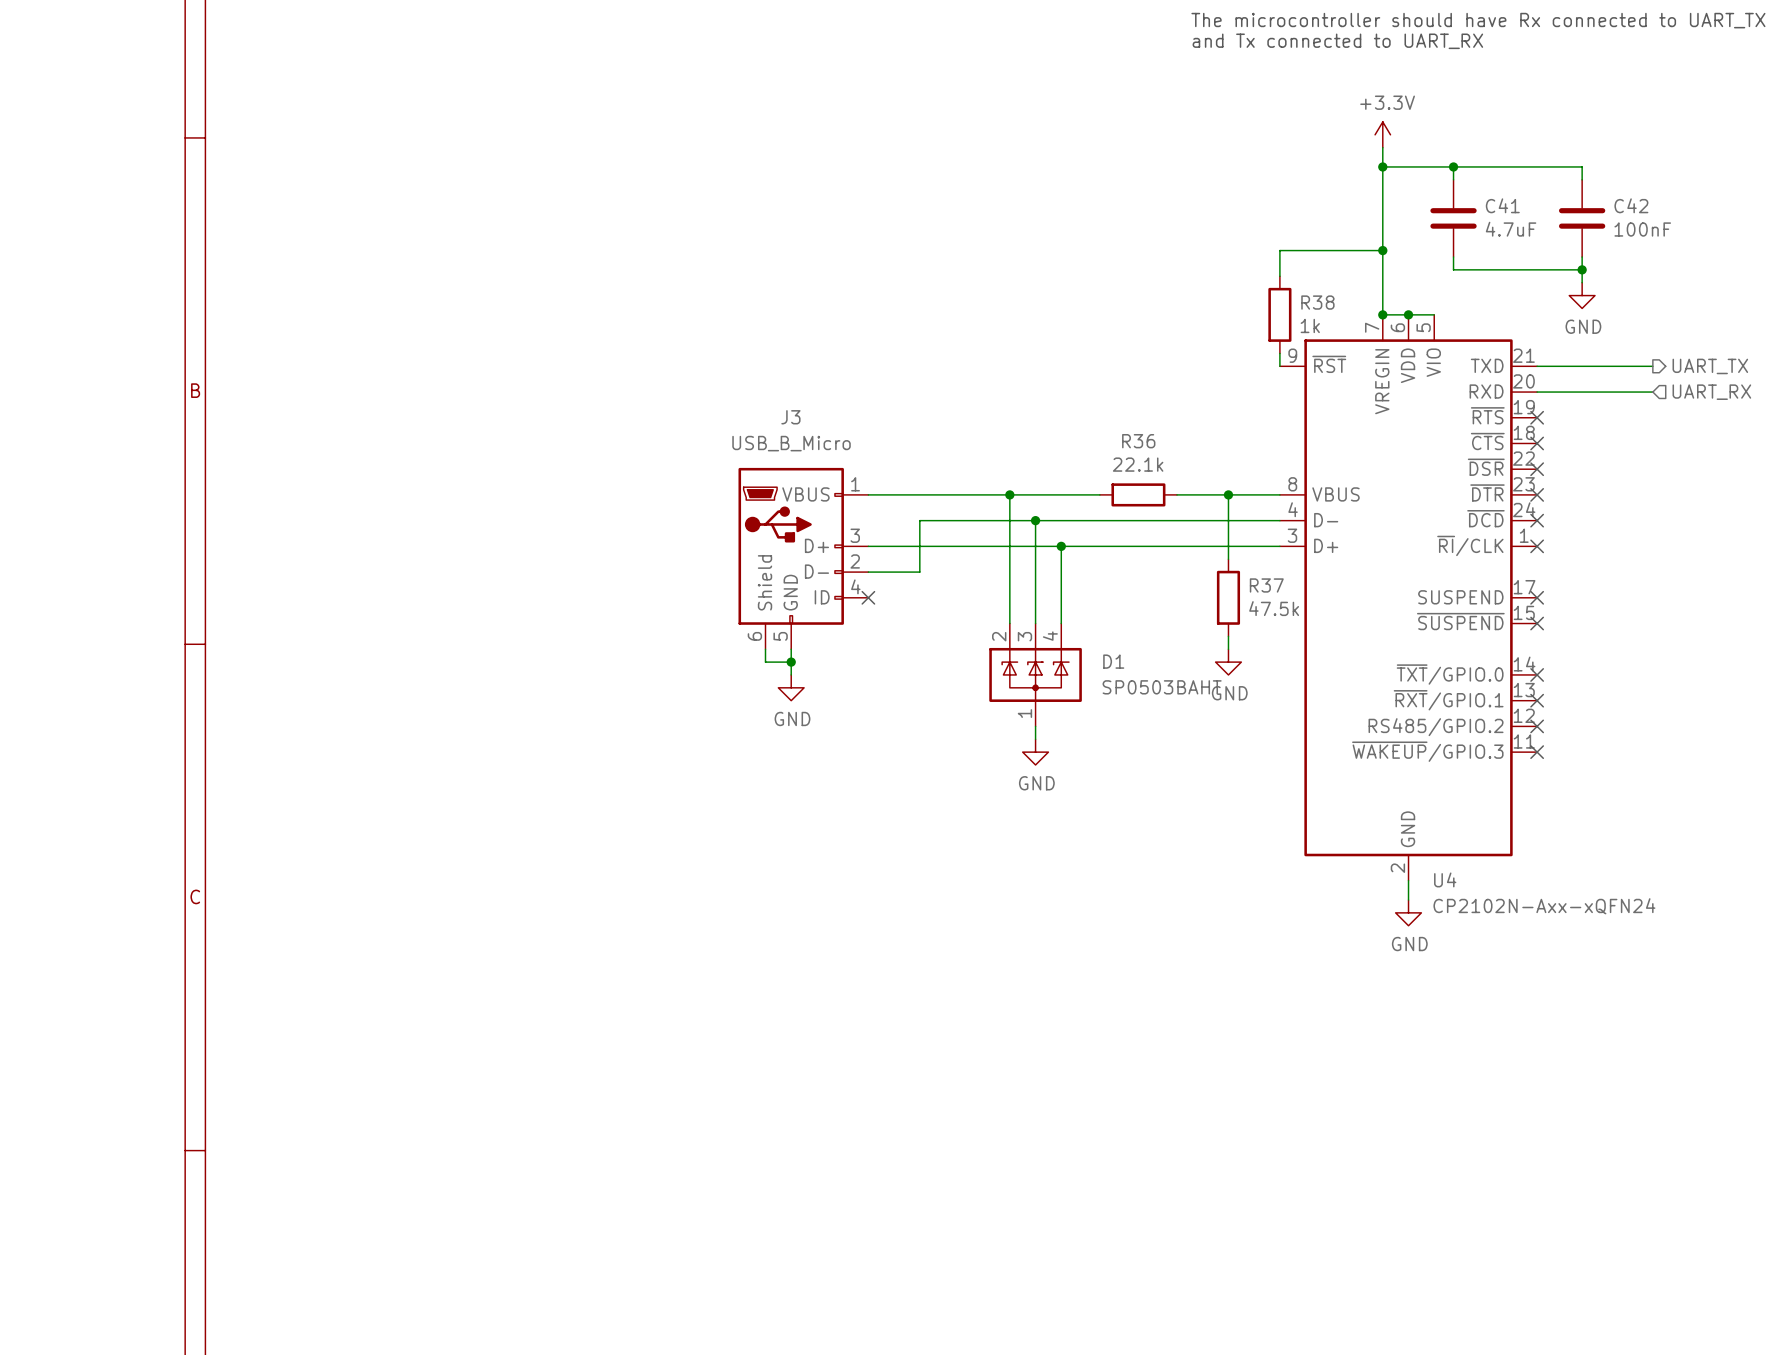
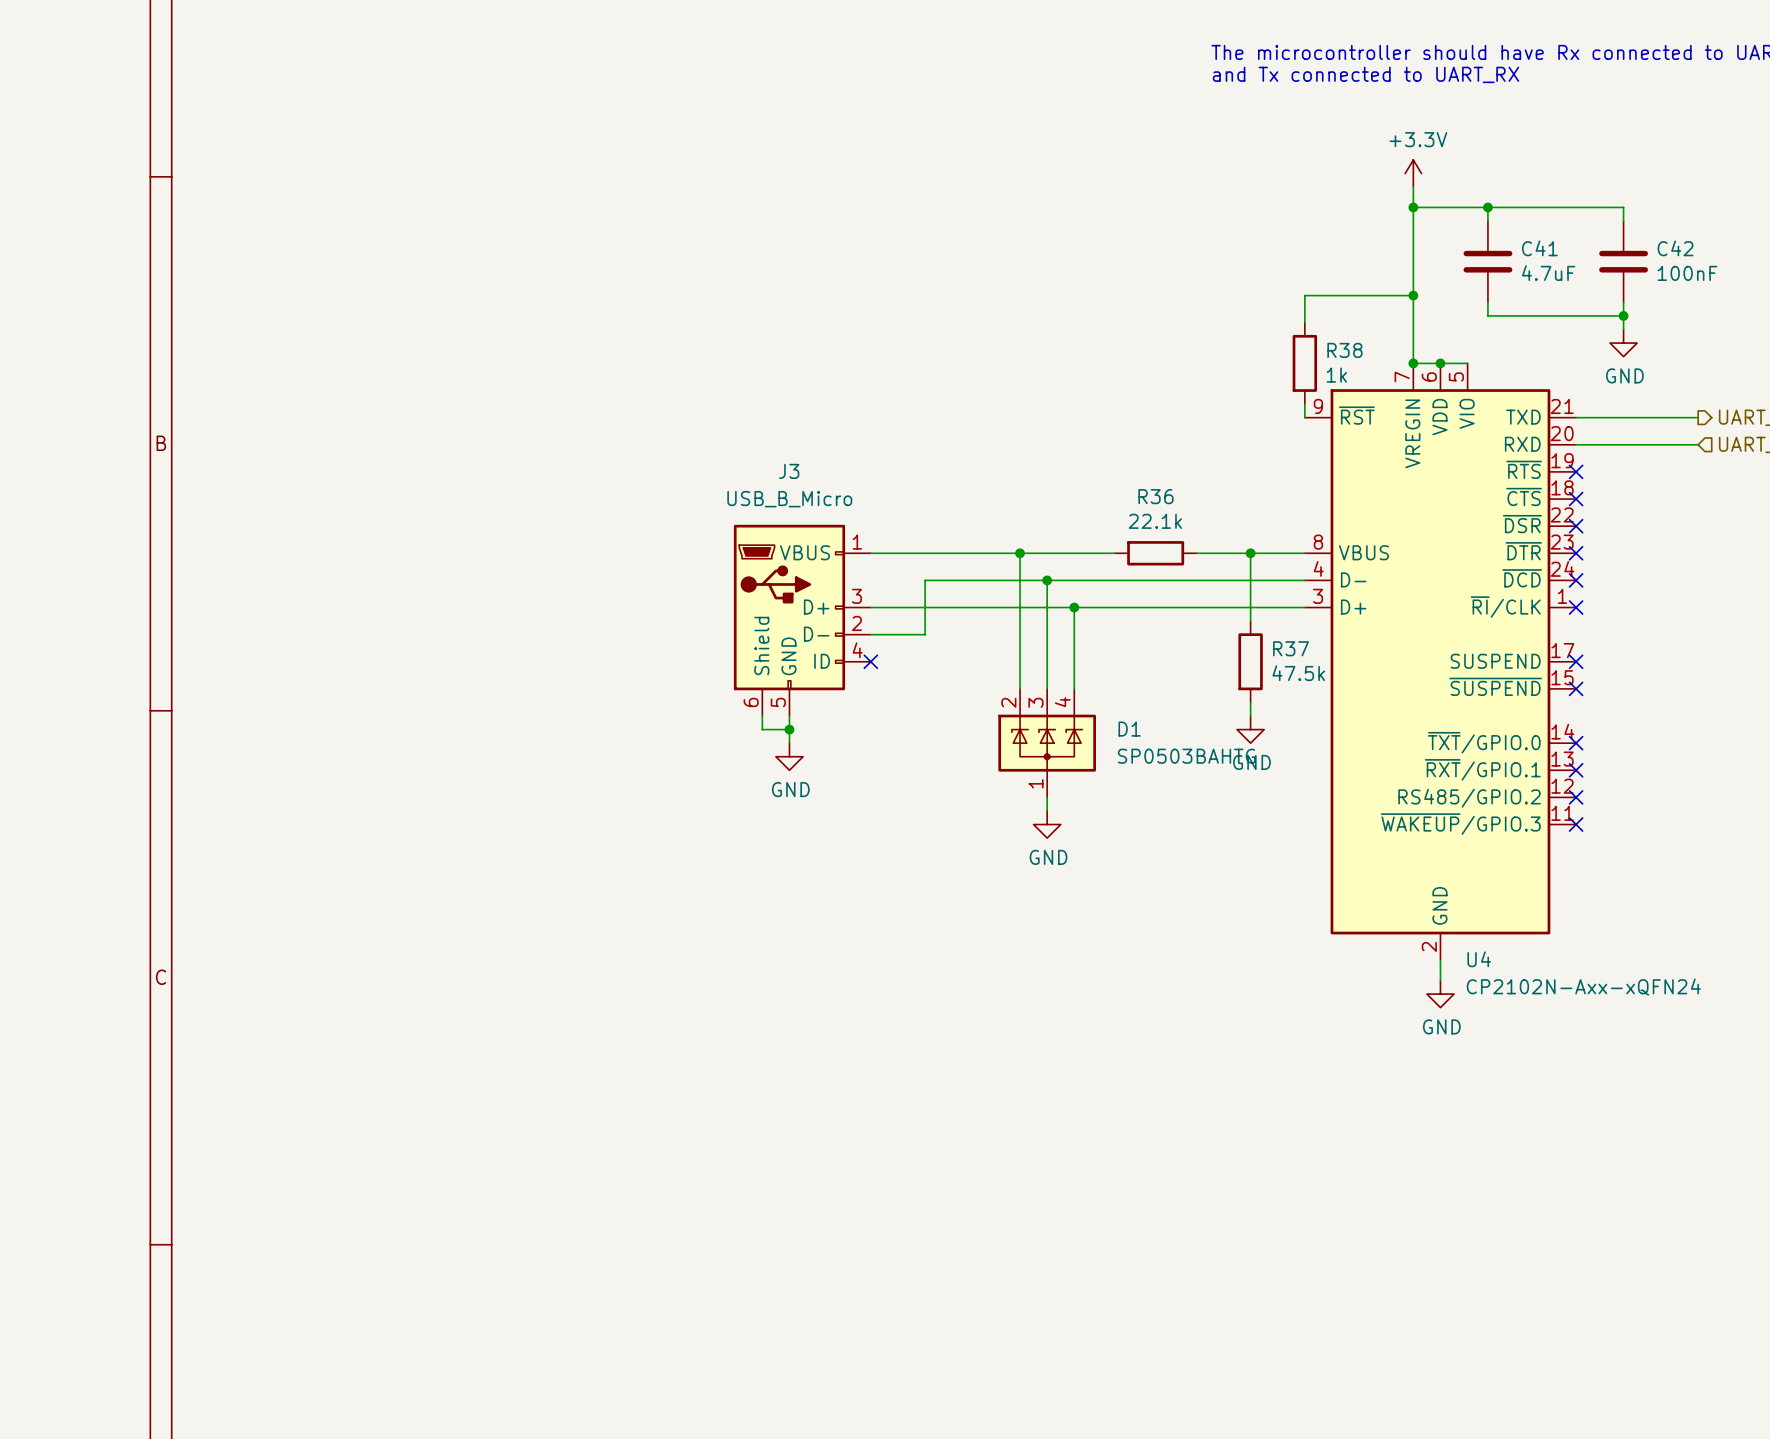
D1 value: SP0503BAHT (1162, 687) -> SP0503BAHTG (1186, 756)

